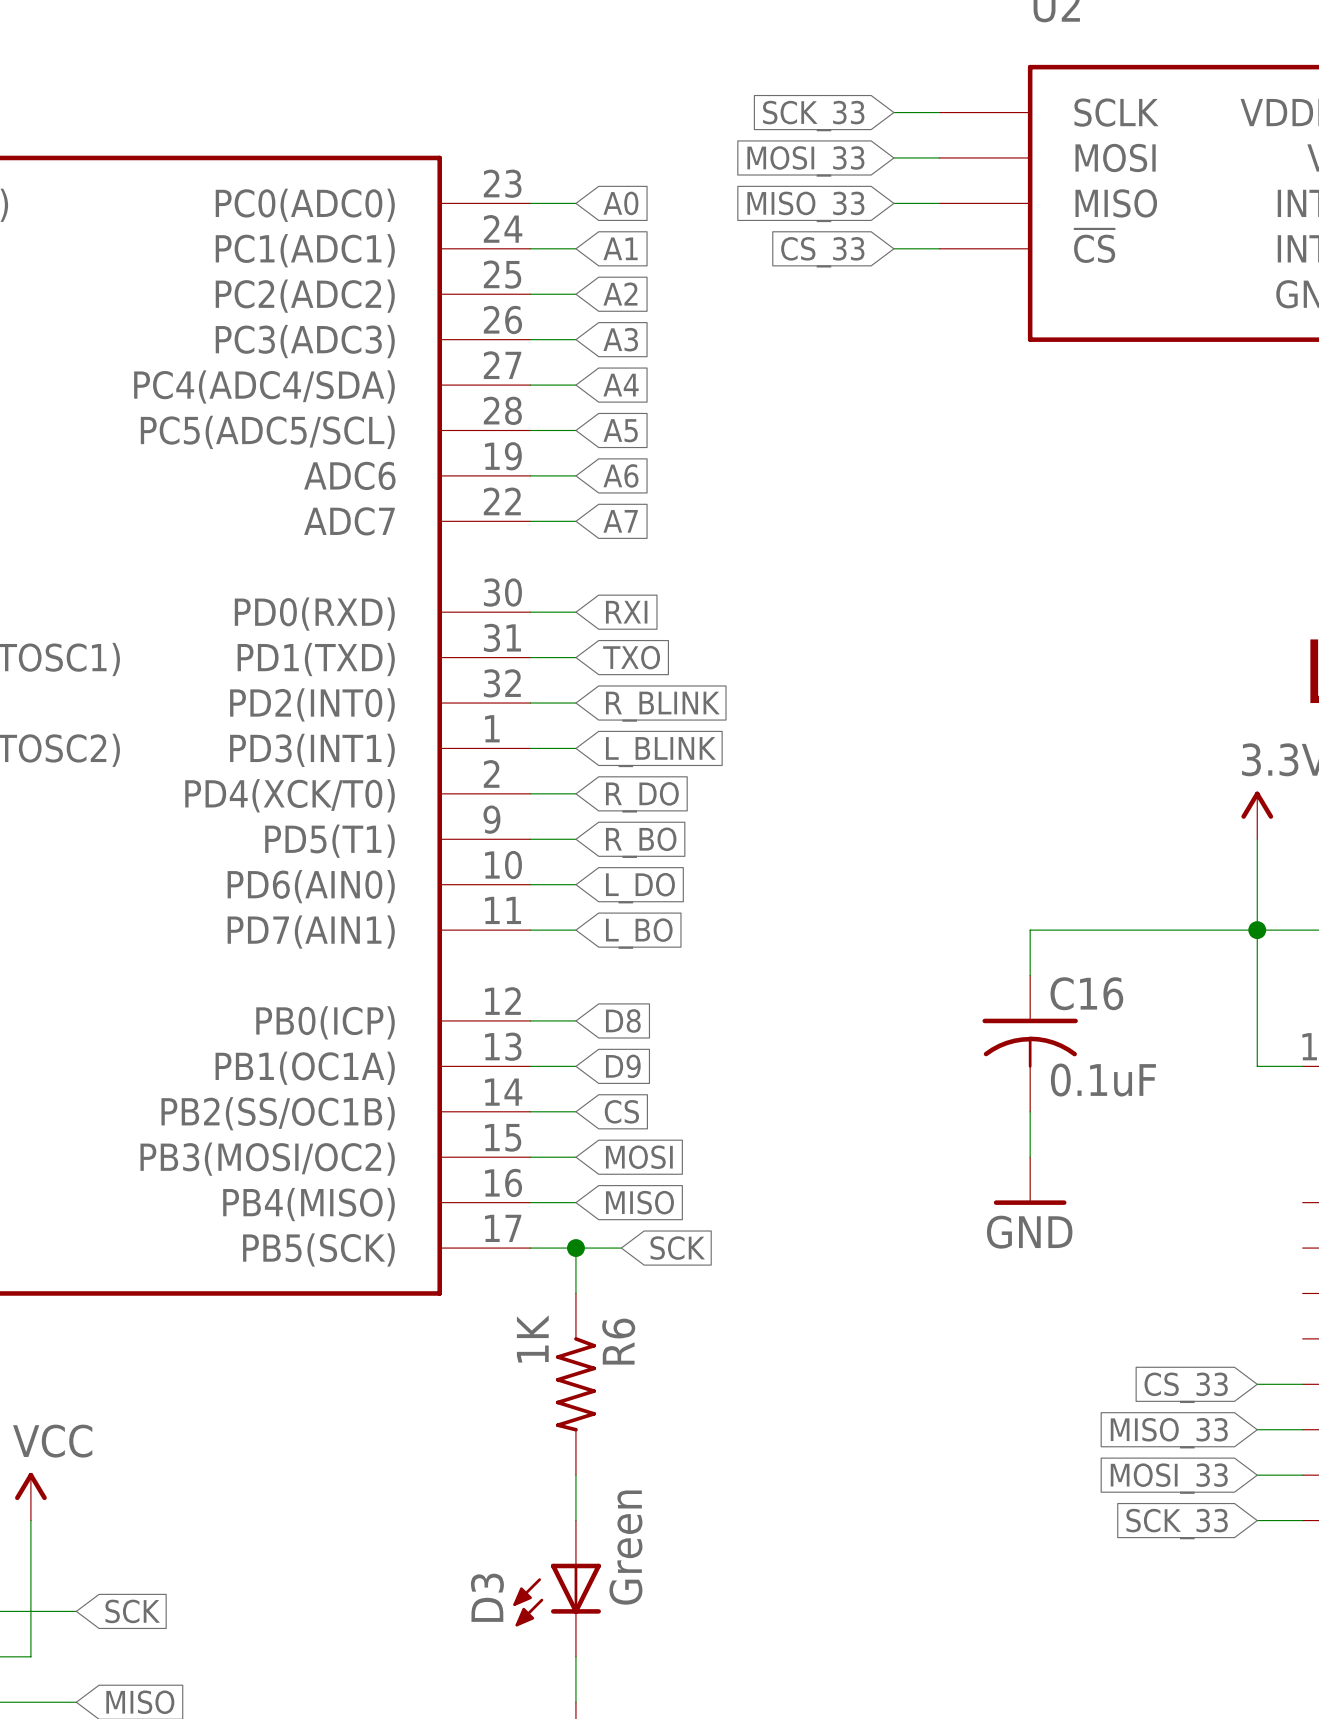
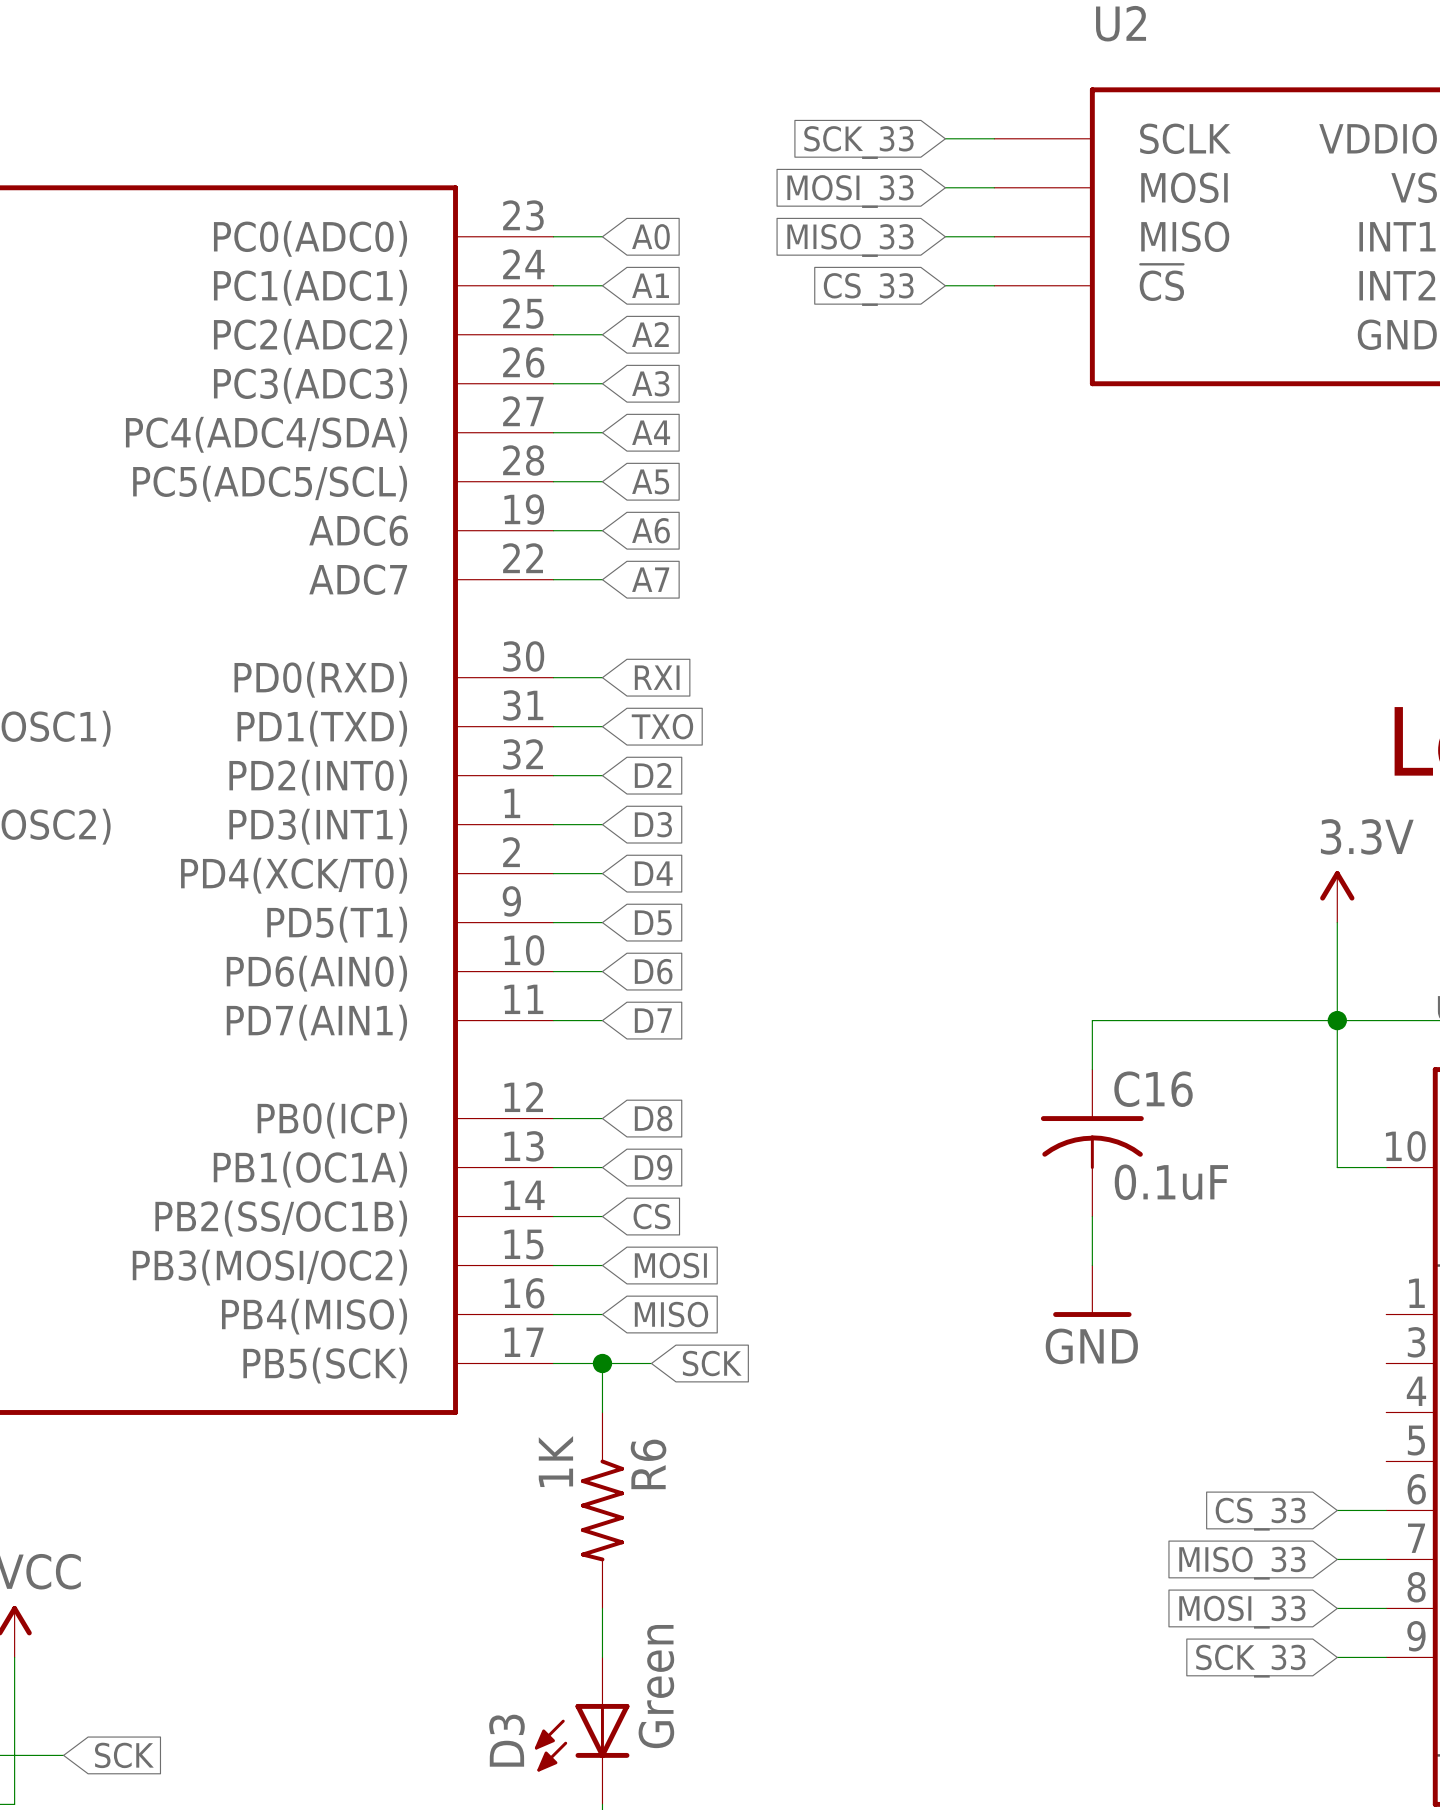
global label: R_BLINK (662, 706) -> D2 (653, 775)
global label: L_BLINK (660, 752) -> D3 (653, 824)
global label: R_DO (642, 797) -> D4 (653, 873)
global label: R_BO (641, 842) -> D5 (653, 922)
global label: L_DO (640, 888) -> D6 (653, 971)
global label: L_BO (639, 933) -> D7 (653, 1020)

